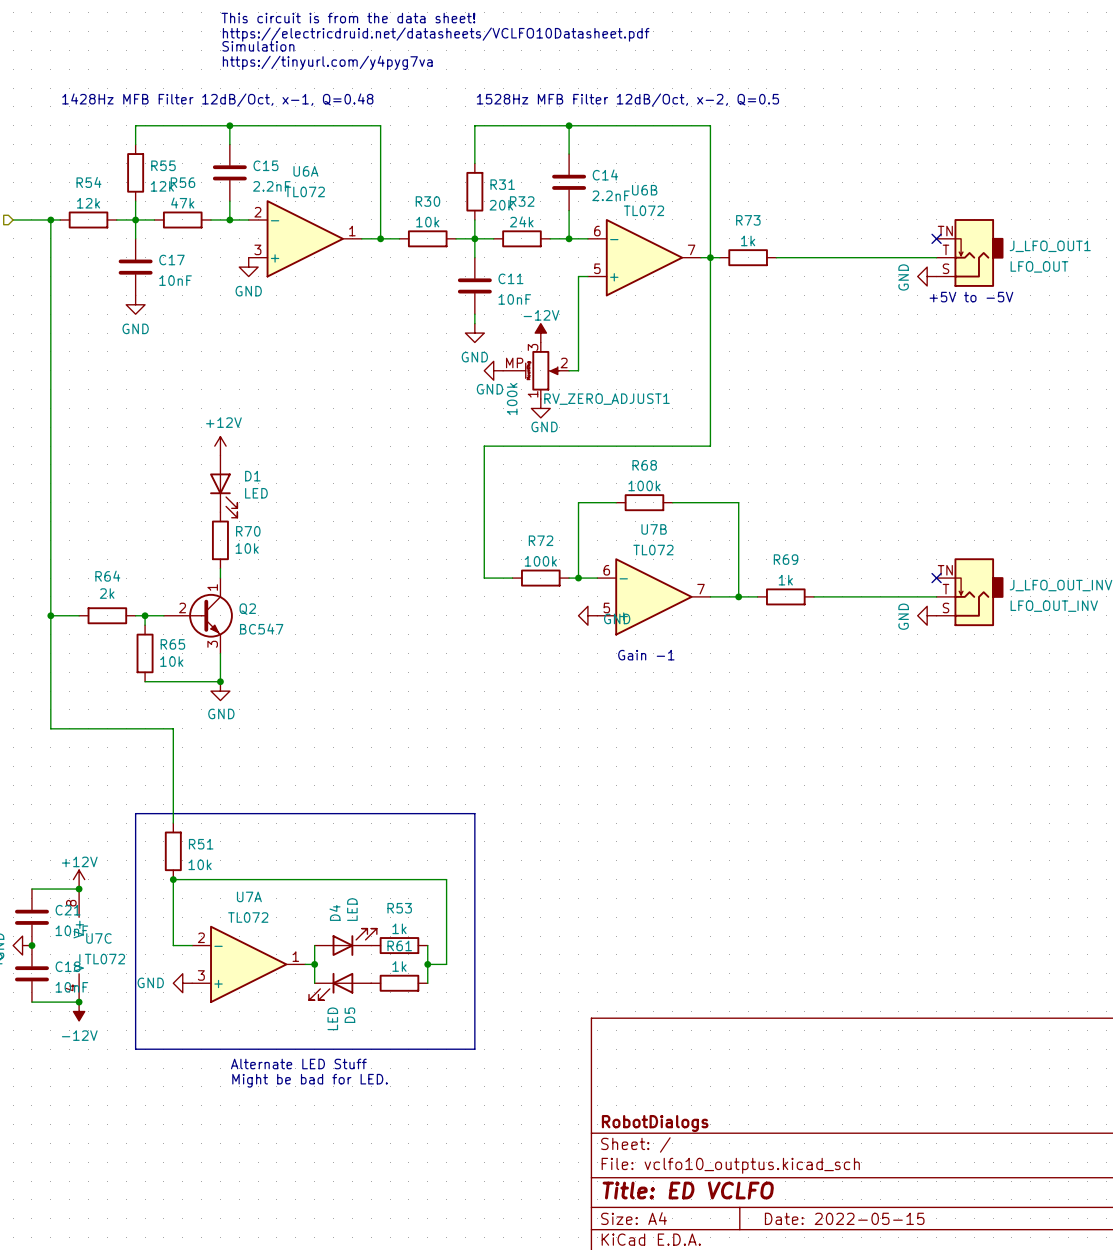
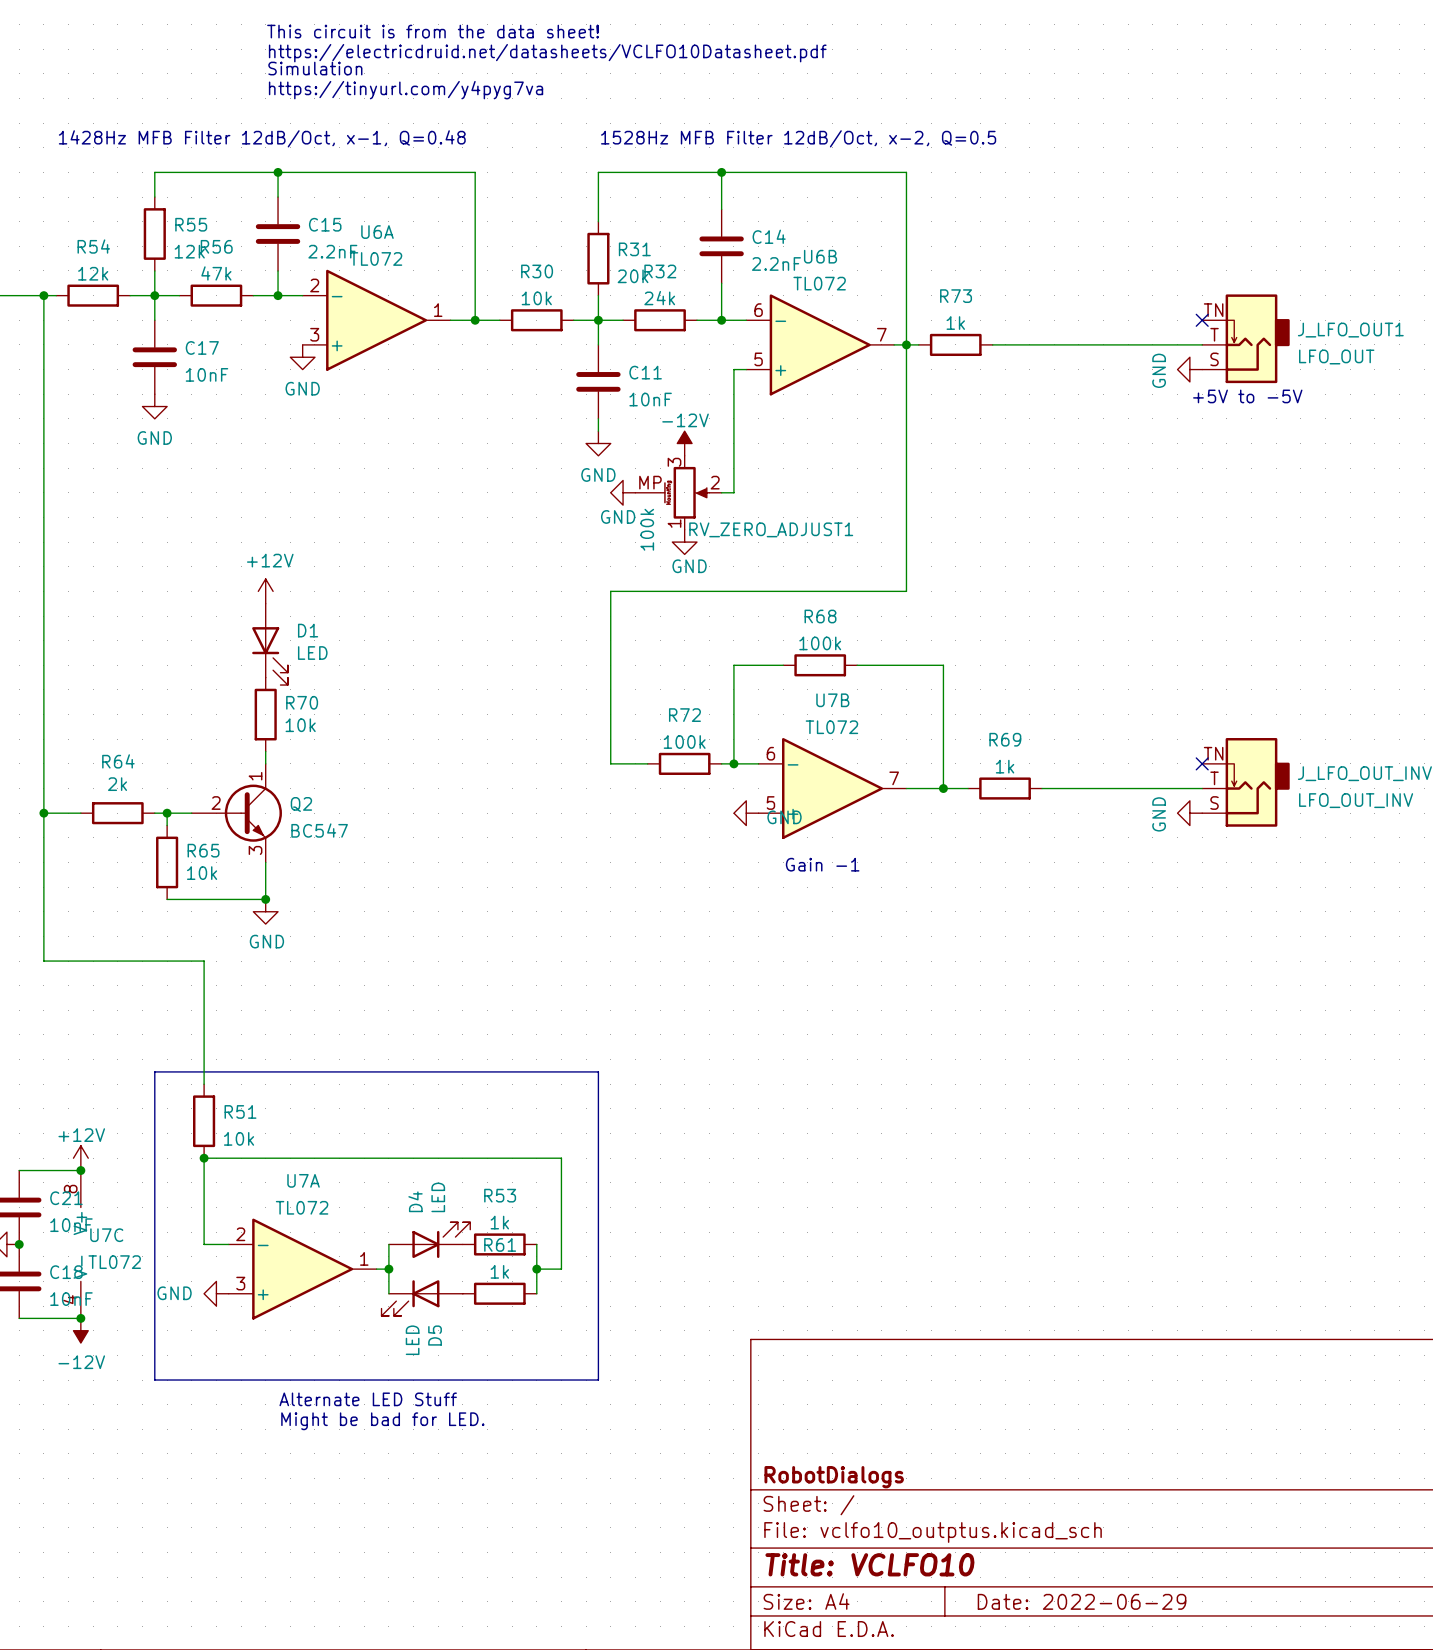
title block: Title: ED VCLFO (688, 1190) -> Title: VCLFO10 (869, 1564)
title block: Date: 2022-05-15 (844, 1218) -> Date: 2022-06-29 (1082, 1601)

